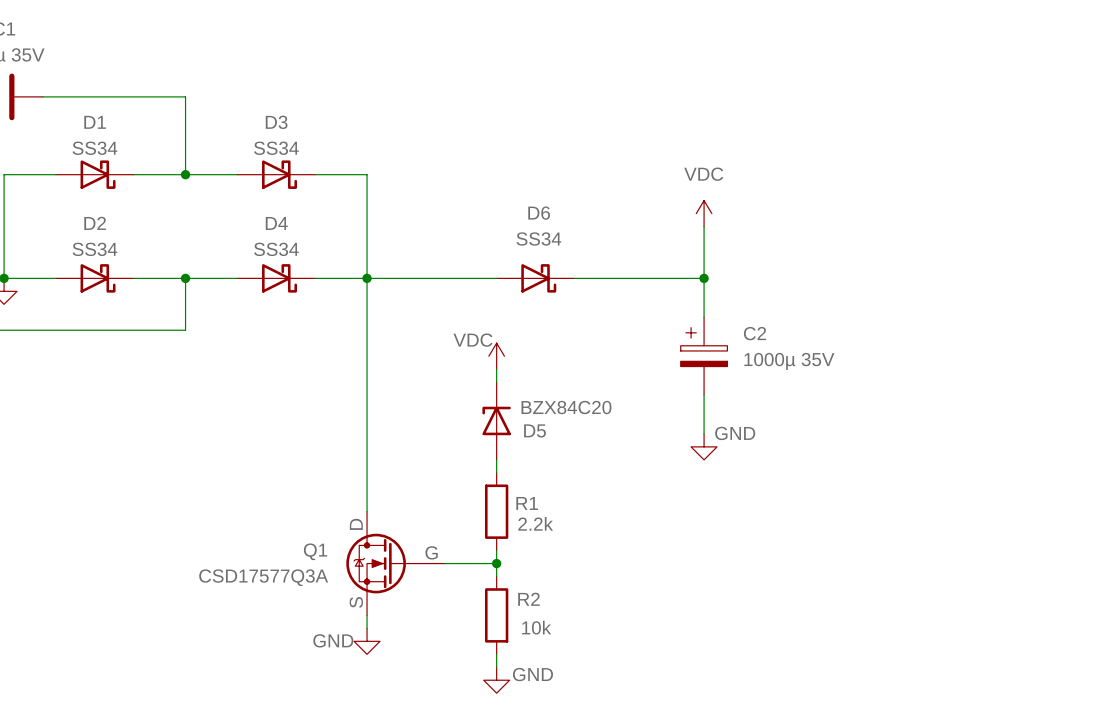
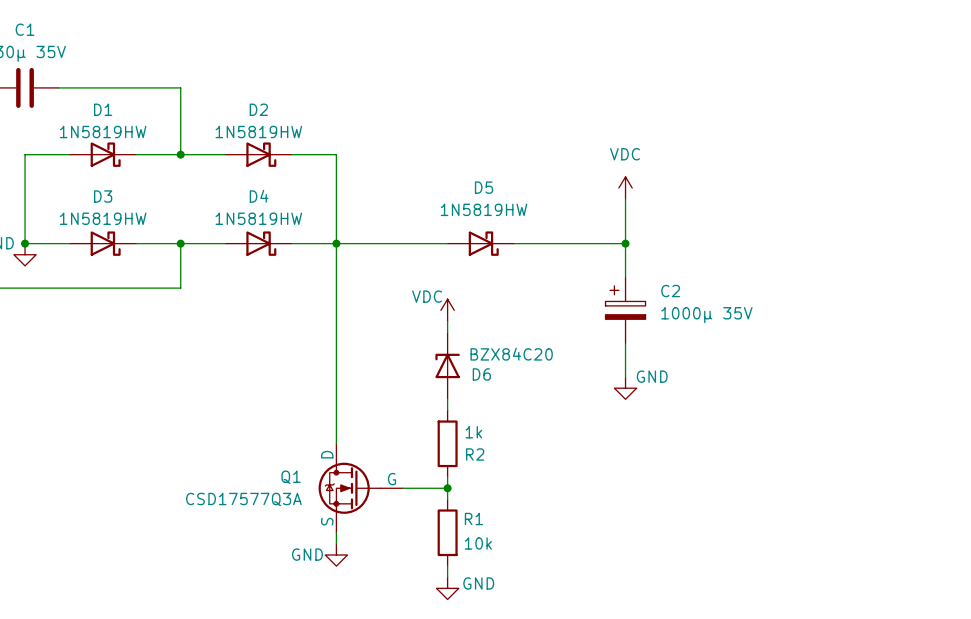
D3 name: D3 (276, 122) -> D2 (258, 109)
D1 value: SS34 (94, 148) -> 1N5819HW (103, 132)
D3 value: SS34 (276, 148) -> 1N5819HW (258, 132)
D6 name: D6 (539, 213) -> D5 (484, 187)
D2 name: D2 (95, 223) -> D3 (103, 196)
D6 value: SS34 (538, 239) -> 1N5819HW (484, 209)
D2 value: SS34 (94, 249) -> 1N5819HW (103, 218)
D4 value: SS34 (276, 249) -> 1N5819HW (258, 218)
D5 name: D5 (535, 430) -> D6 (481, 374)
R1 name: R1 (527, 503) -> R2 (475, 454)
R1 value: 2.2k (535, 523) -> 1k (473, 432)
R2 name: R2 (528, 599) -> R1 (473, 519)

